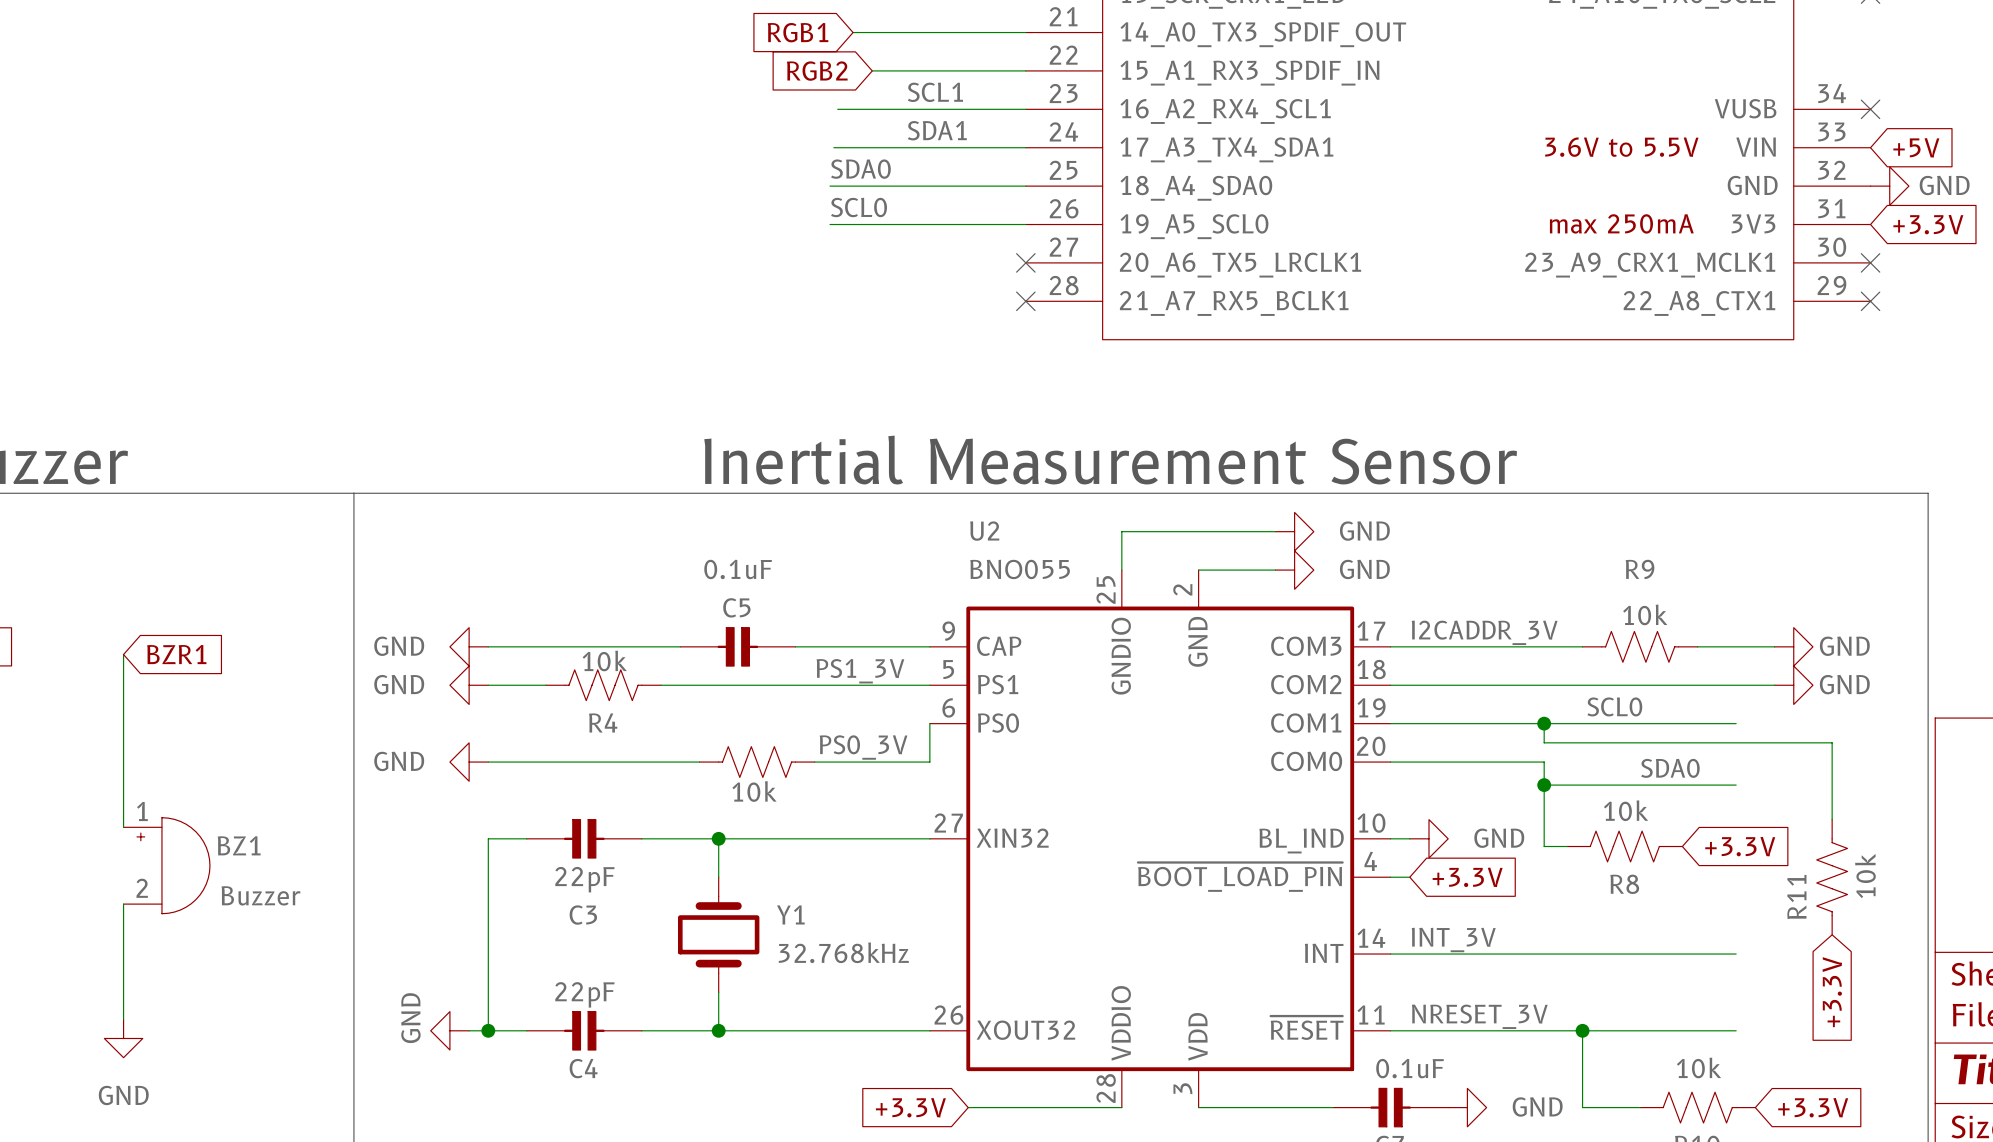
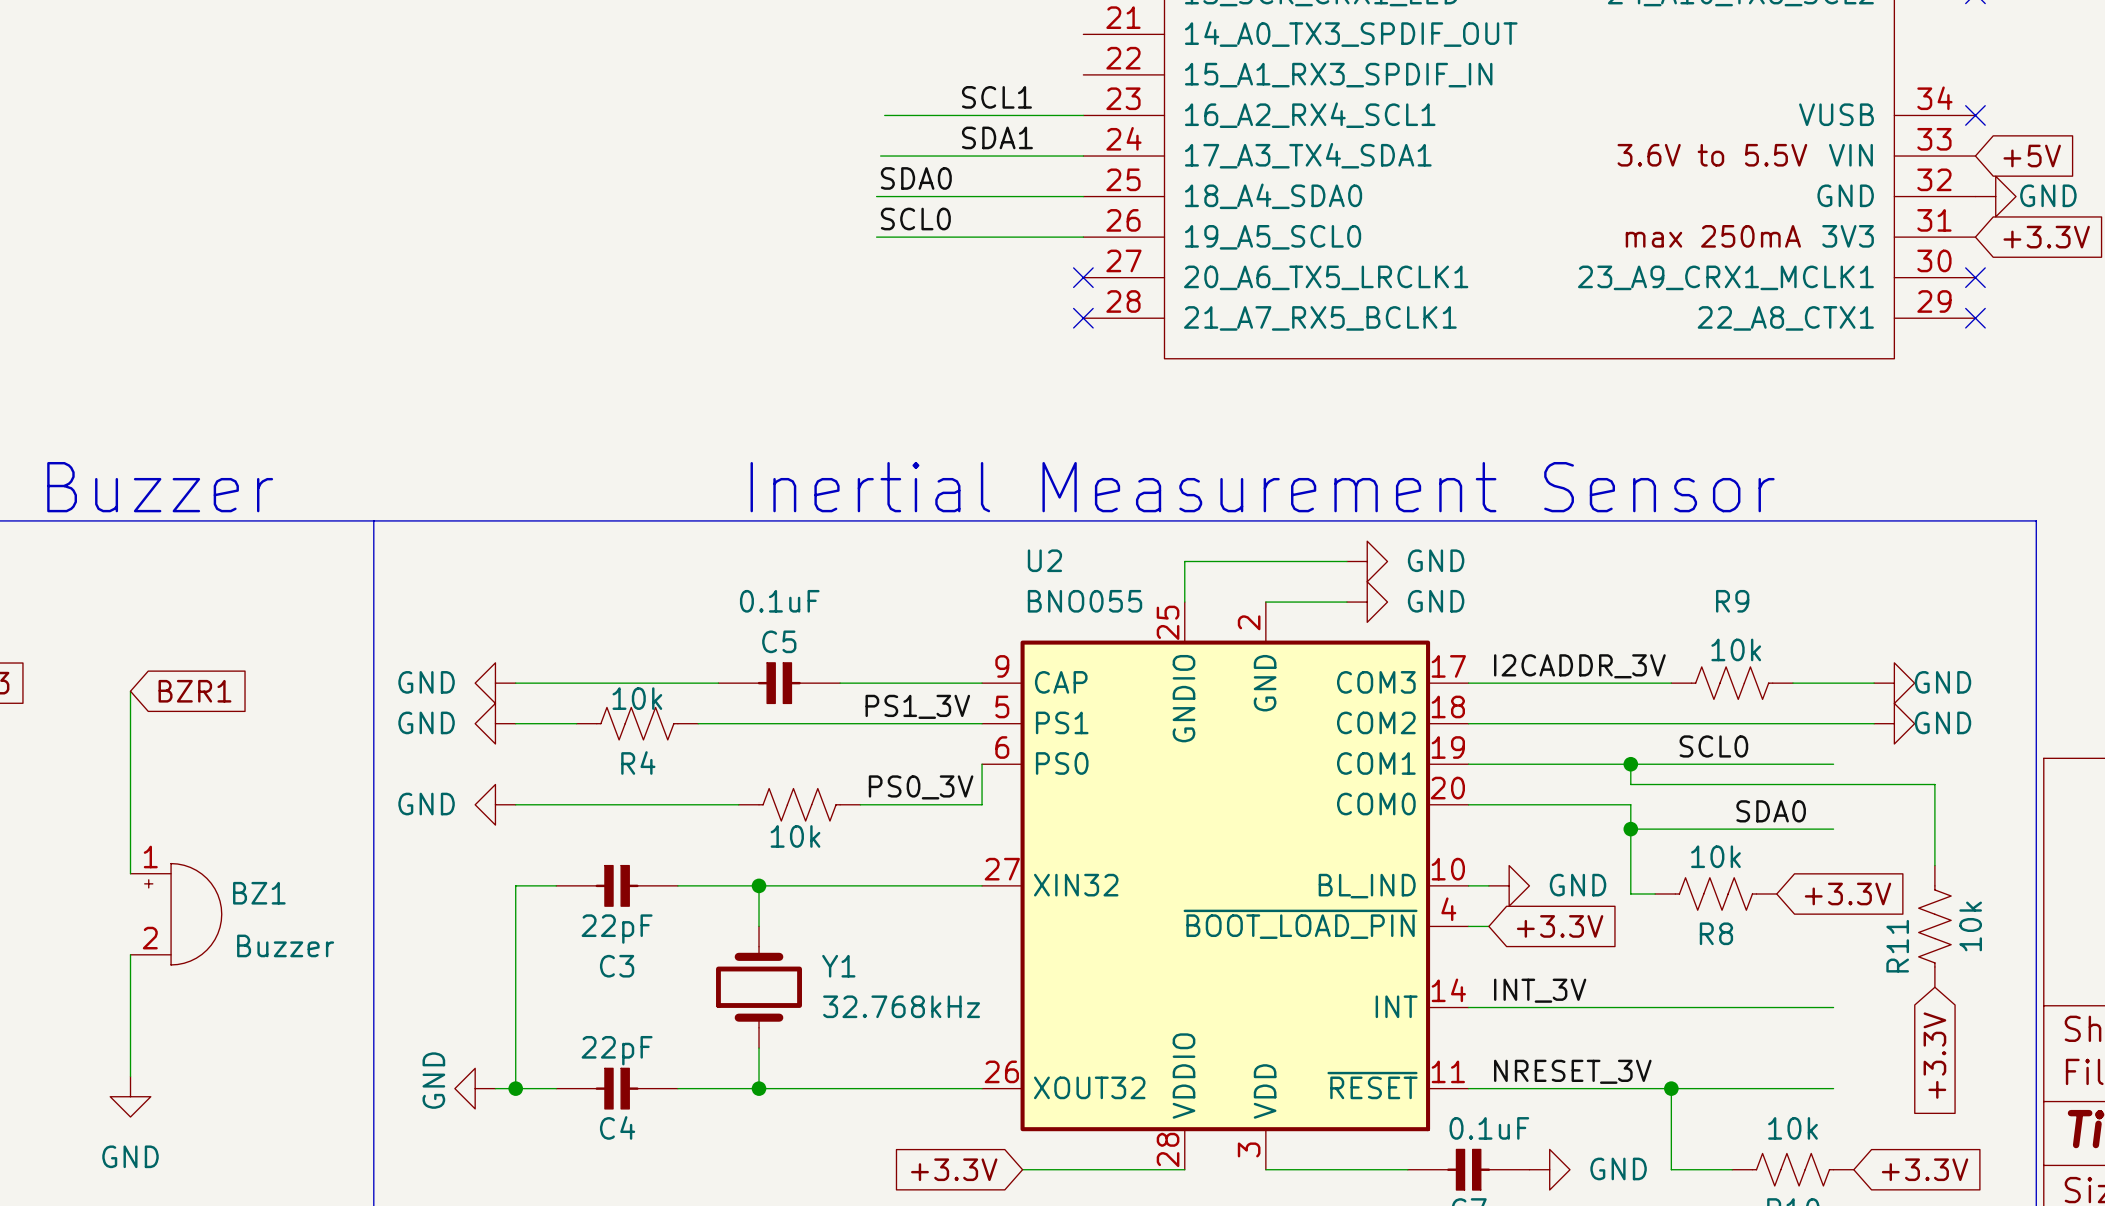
global label: RGB1 (798, 32) -> none
wire: (853, 32) (1025, 32) -> none
wire: (872, 70) (1025, 70) -> none
global label: RGB2 (817, 71) -> none

